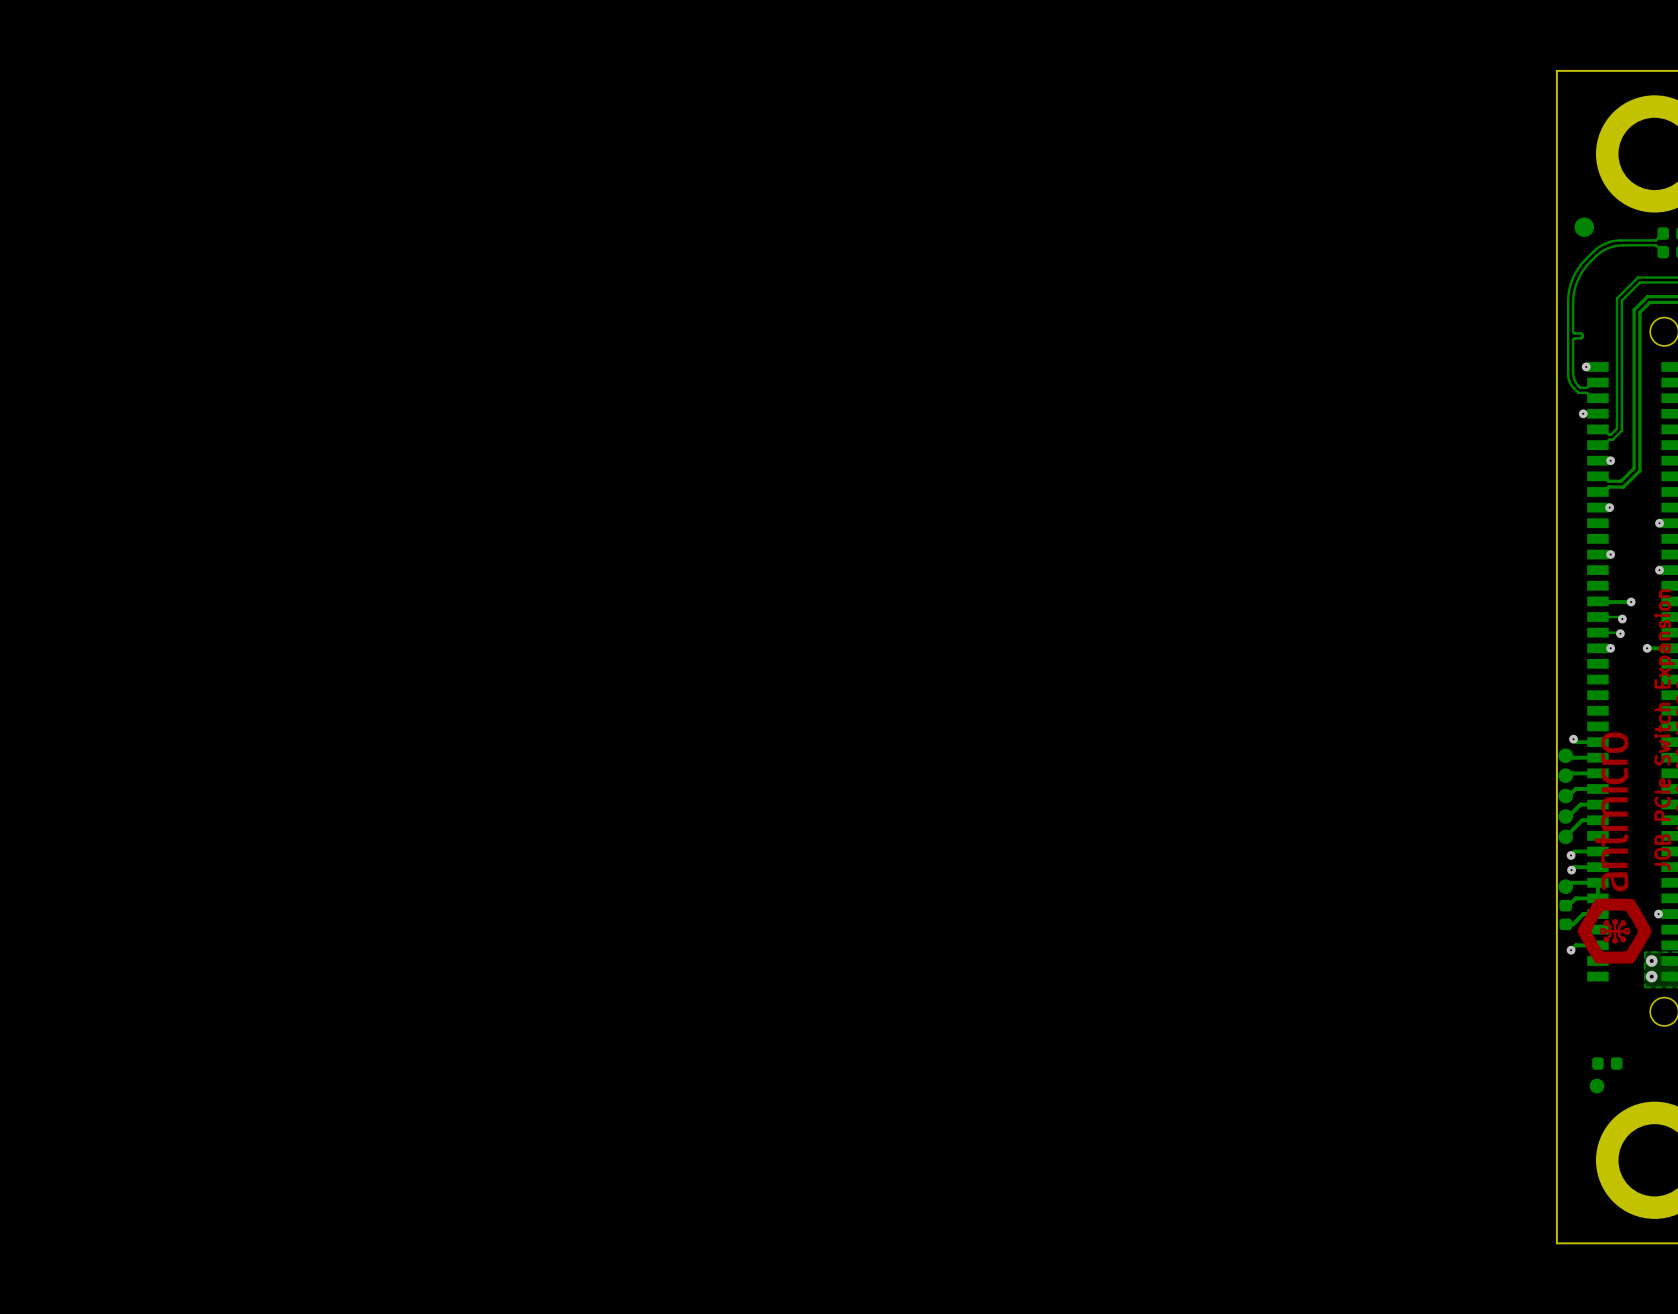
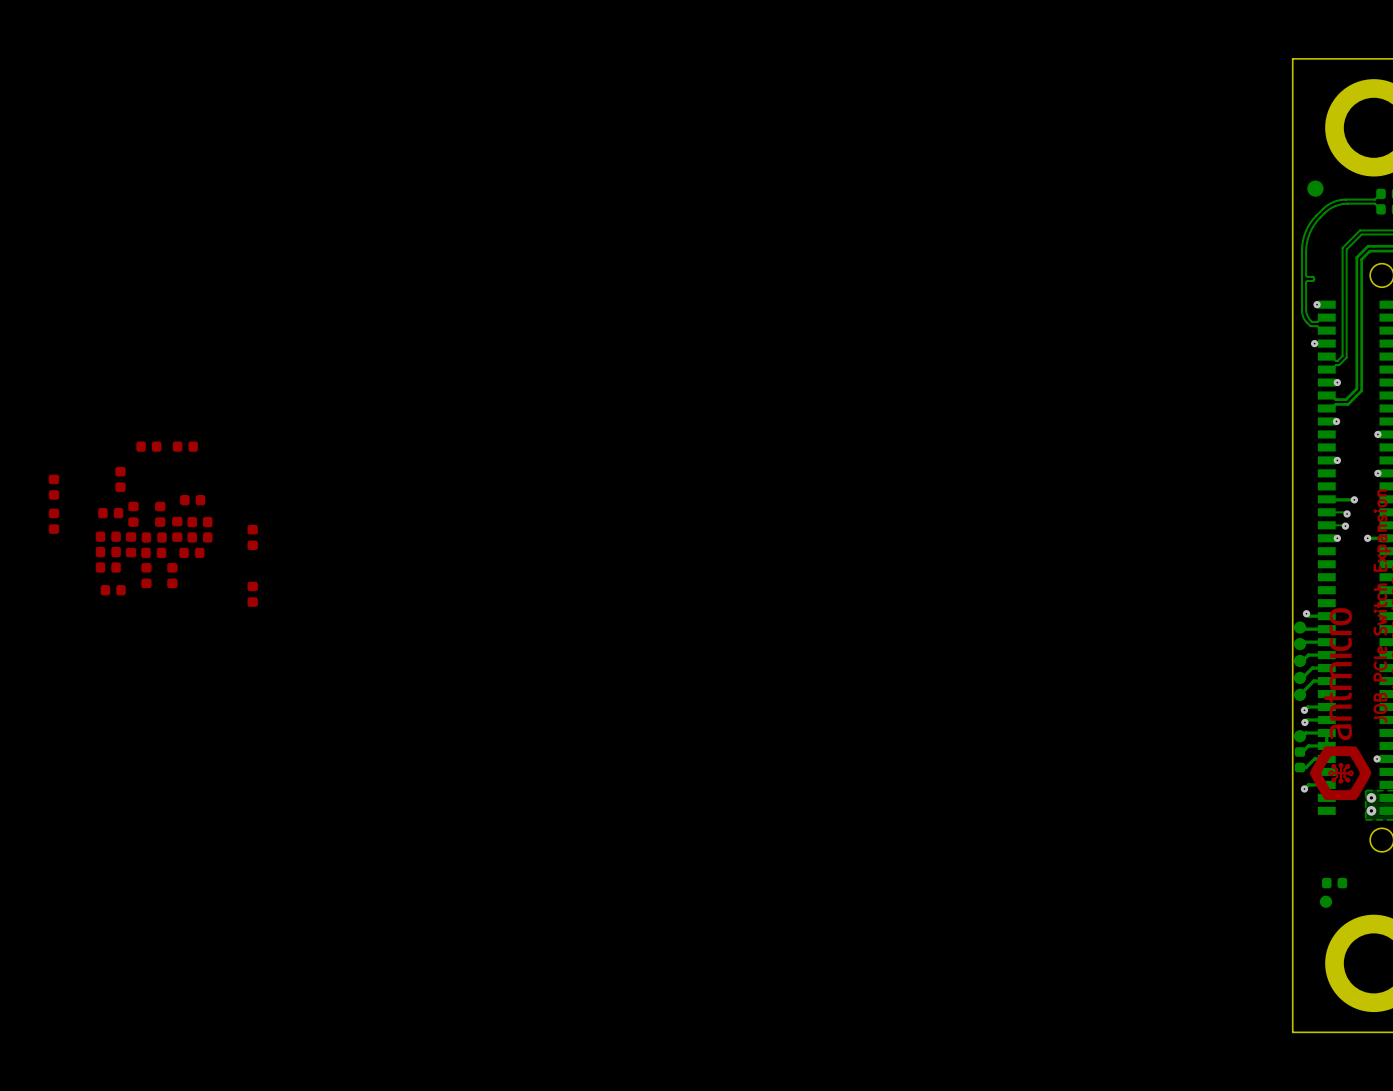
part: none -> (148, 446)
part: none -> (185, 446)
part: none -> (120, 479)
part: none -> (53, 487)
part: none -> (192, 500)
part: none -> (110, 513)
part: none -> (133, 514)
part: none -> (160, 514)
part: none -> (53, 521)
part: none -> (199, 522)
part: none -> (177, 529)
part: none -> (108, 536)
part: none -> (154, 537)
part: none -> (199, 537)
part: none -> (252, 537)
part: none -> (131, 544)
part: none -> (108, 552)
part: none -> (153, 552)
part: none -> (191, 552)
part: none -> (108, 567)
part: none -> (146, 575)
part: none -> (172, 575)
part: none -> (113, 590)
part: none -> (252, 594)

